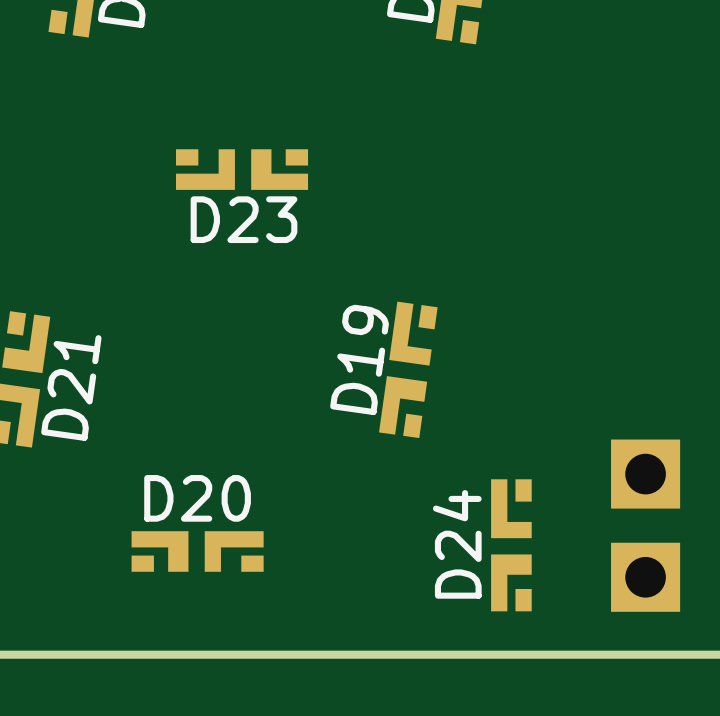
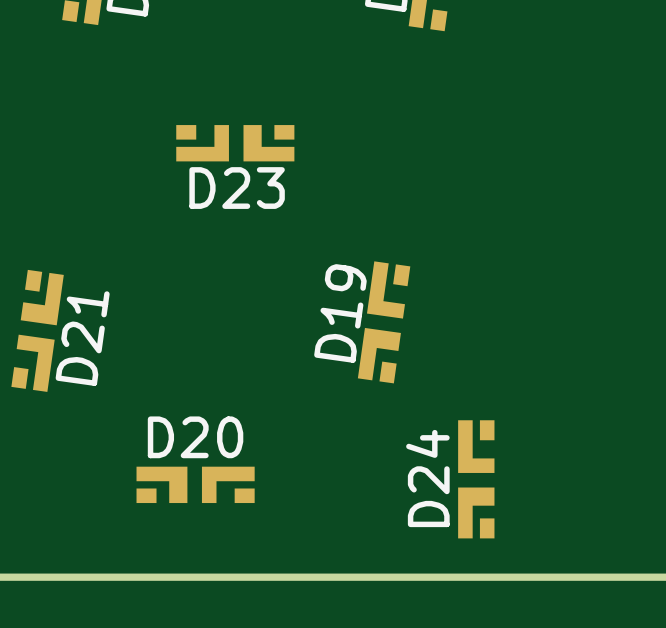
part: (645, 474) -> none
part: (645, 577) -> none

